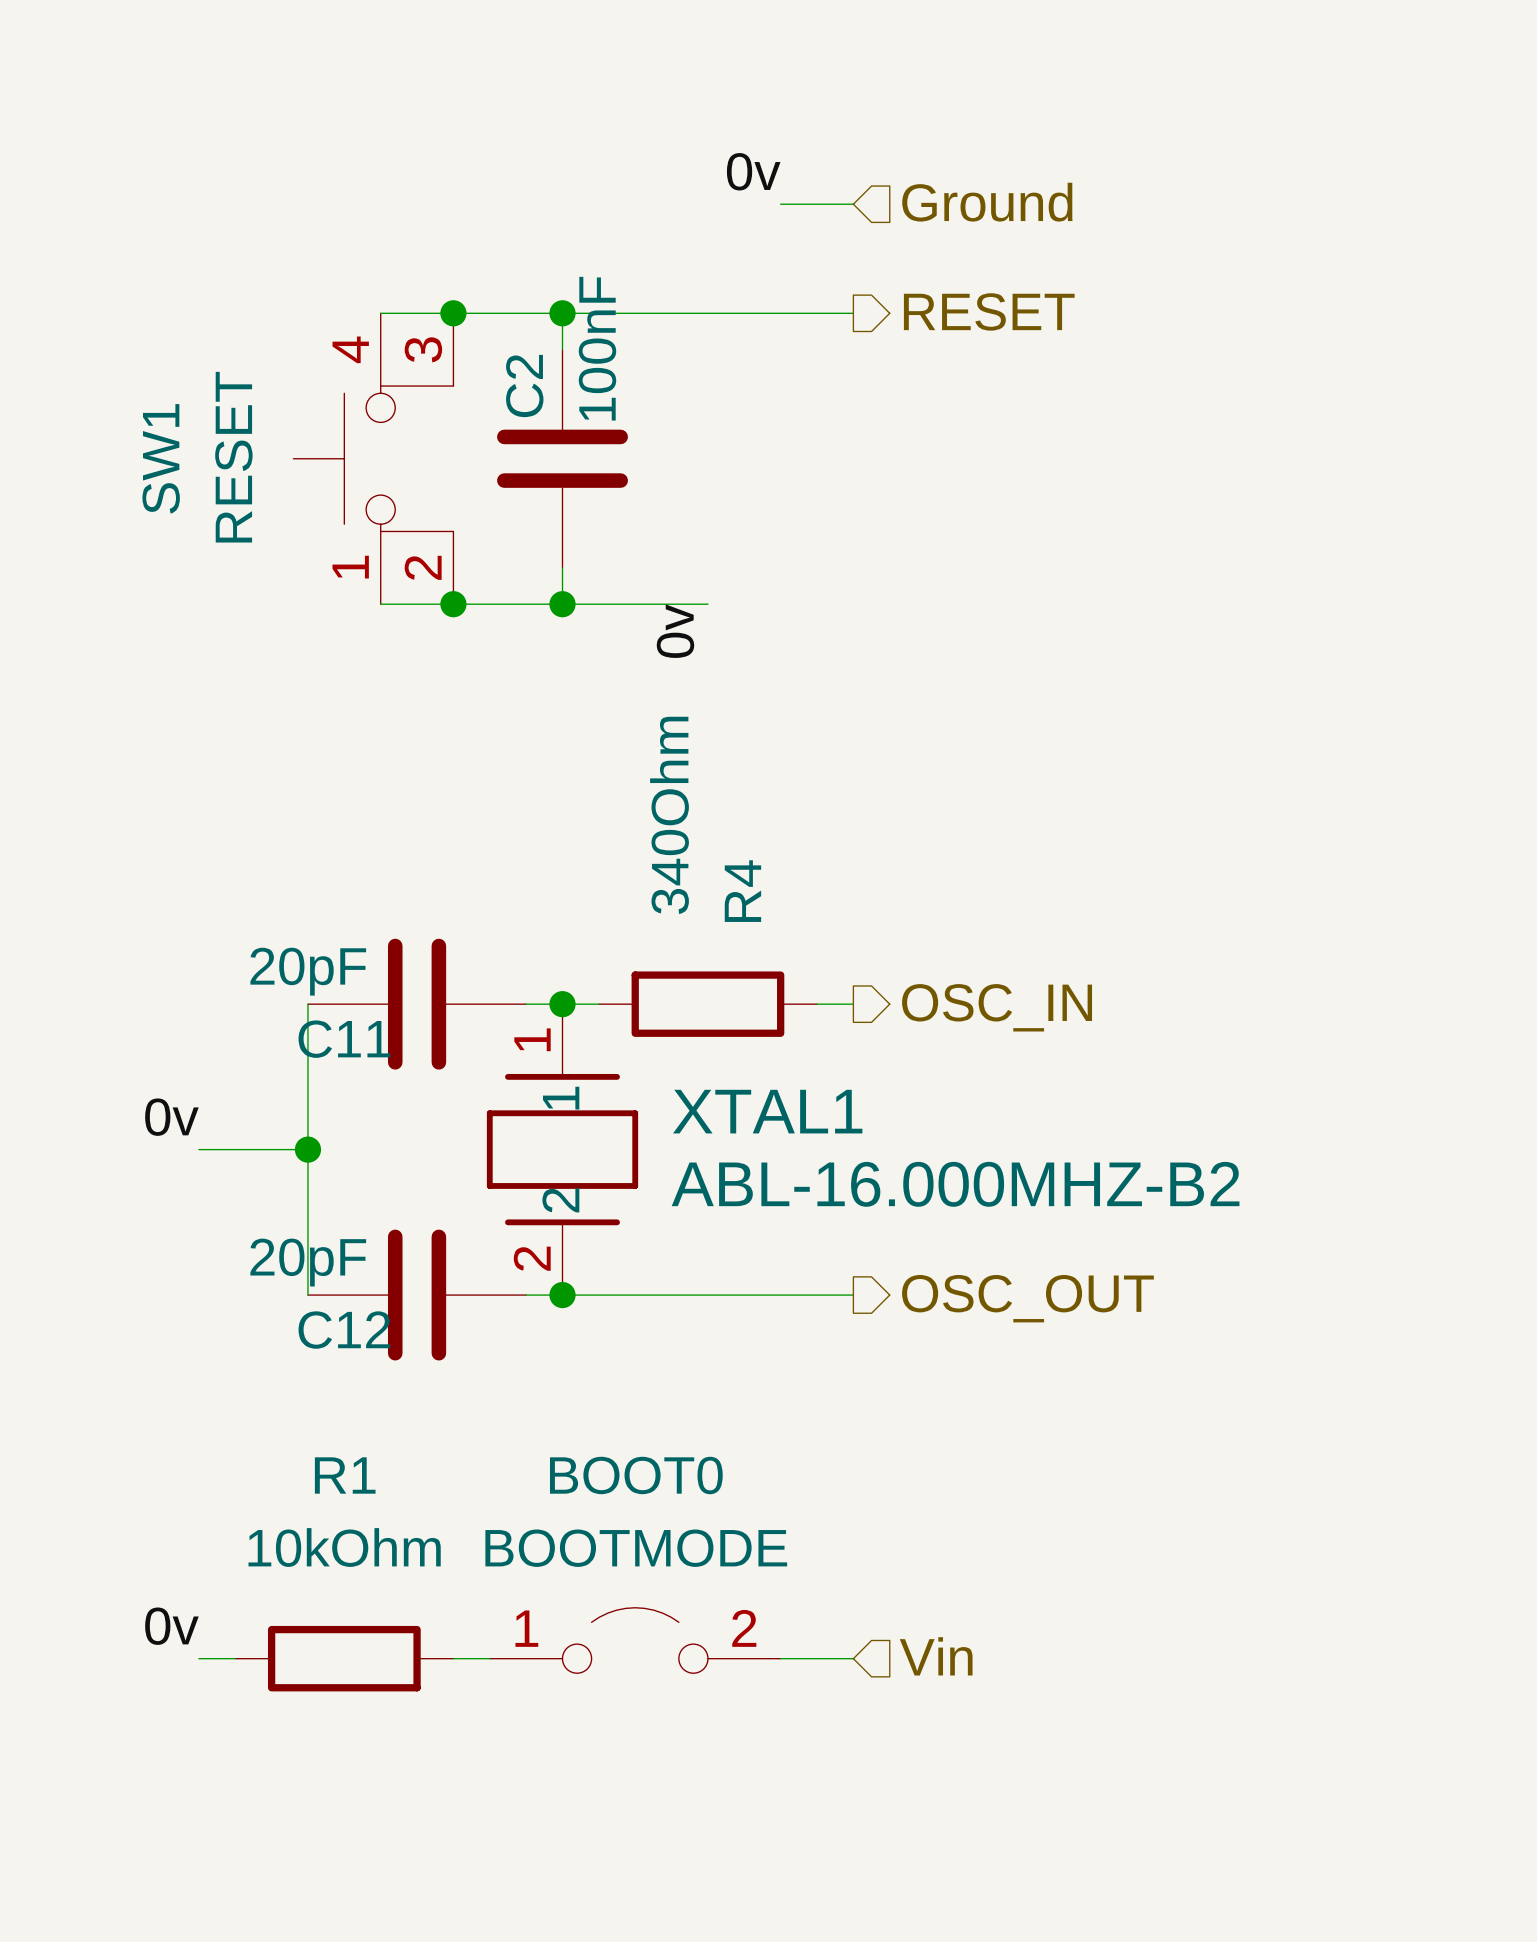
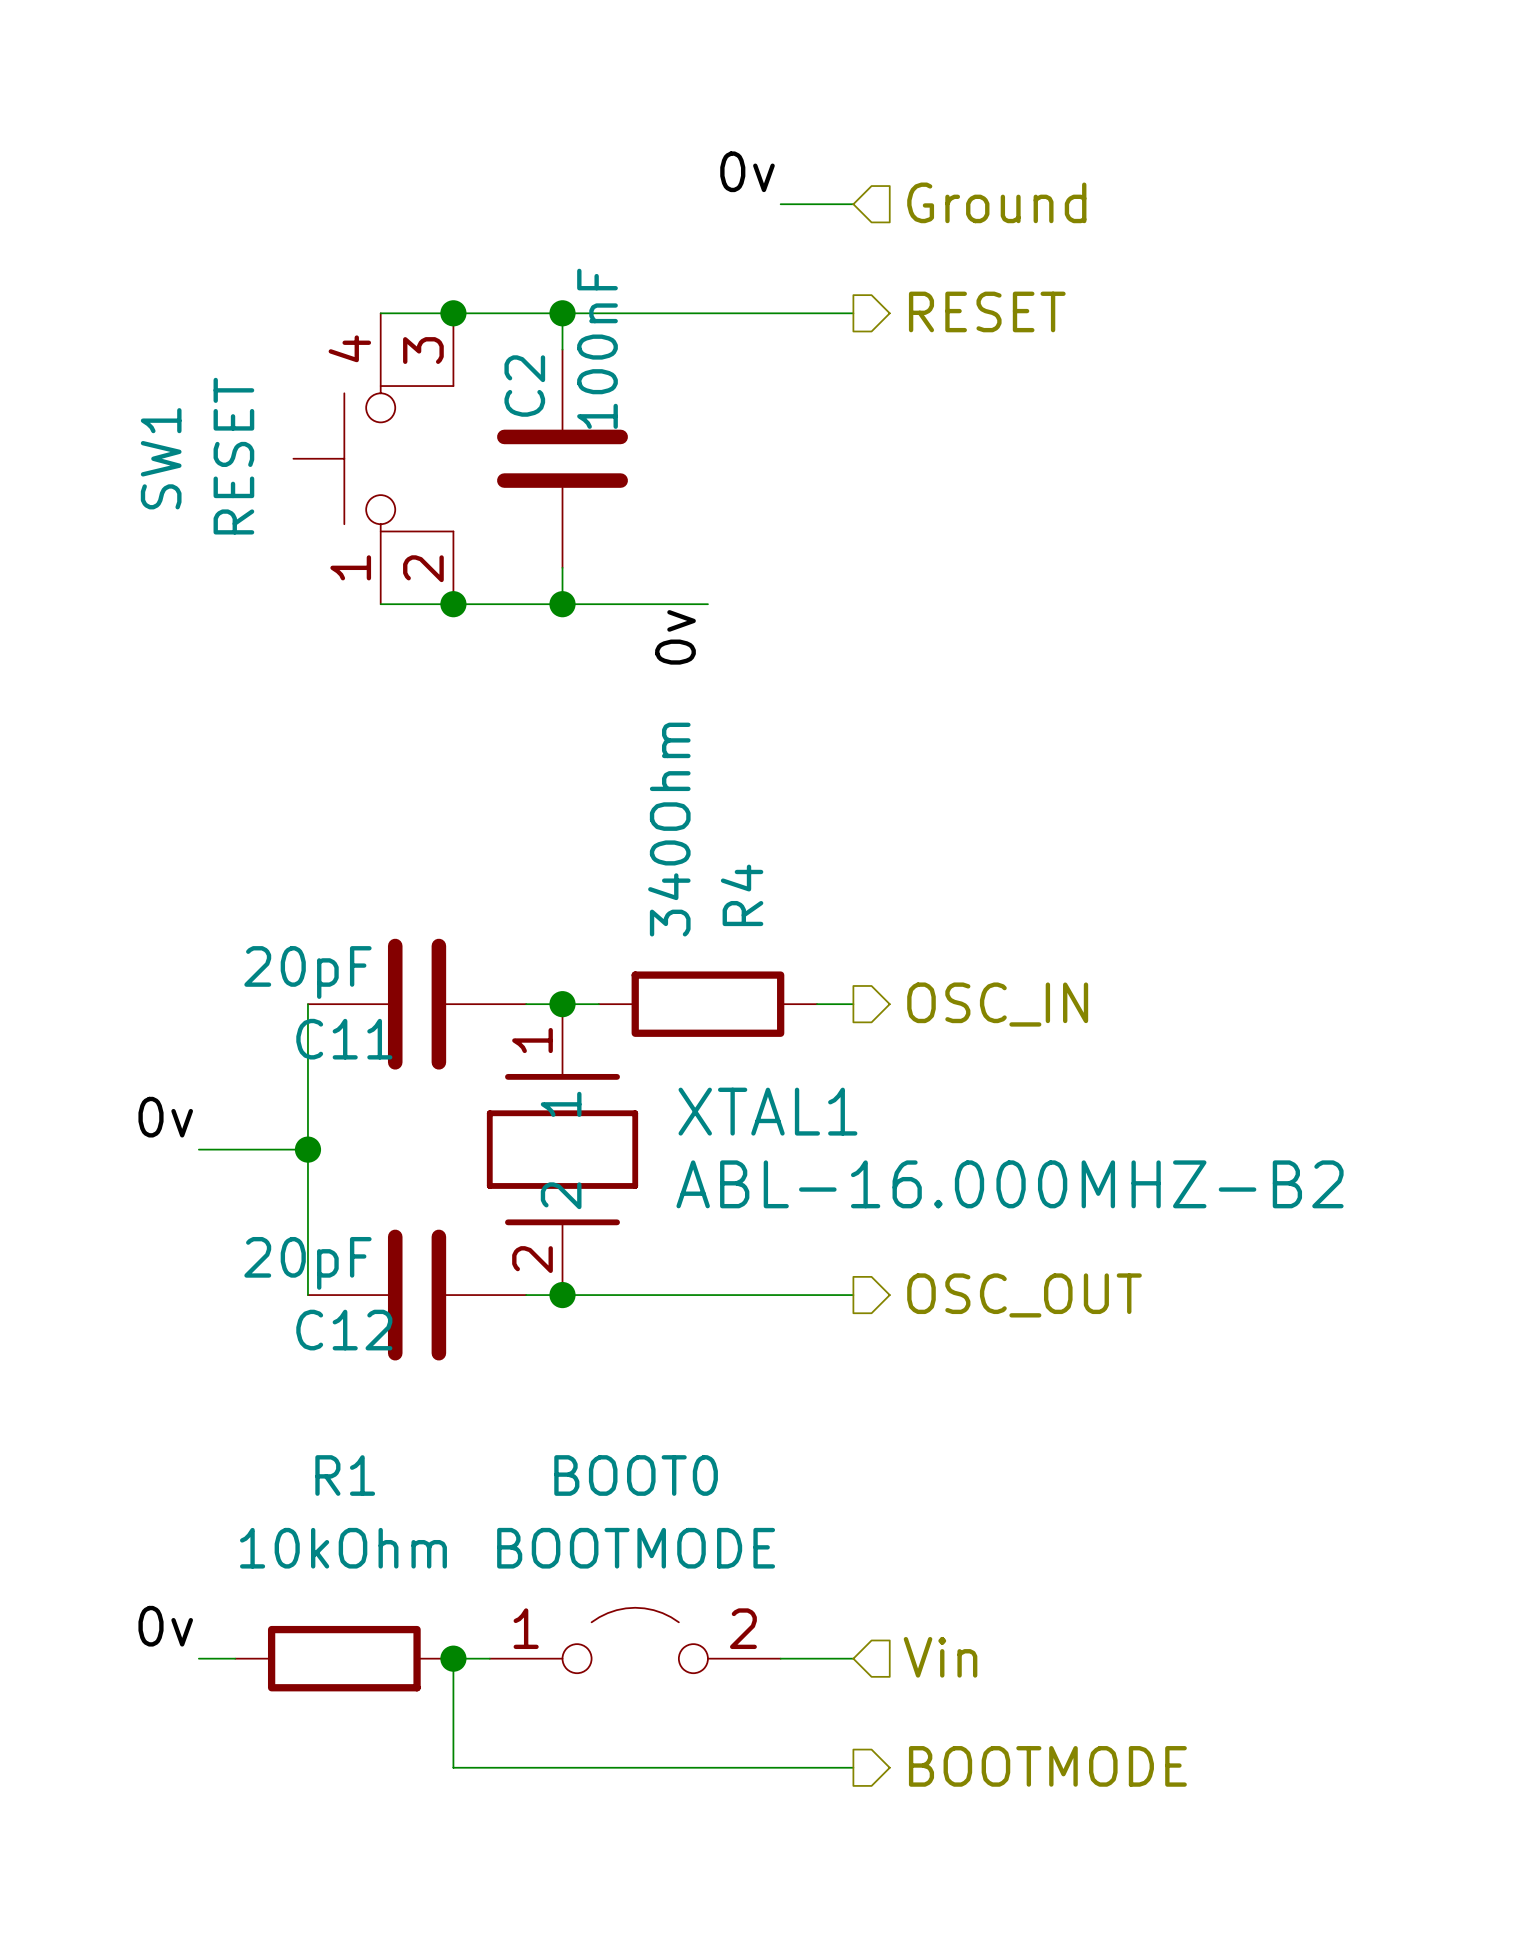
wire: none -> (453, 1658) (453, 1767) (853, 1767)
junction: none -> (453, 1658)
hierarchical label: none -> BOOTMODE (1047, 1766)

